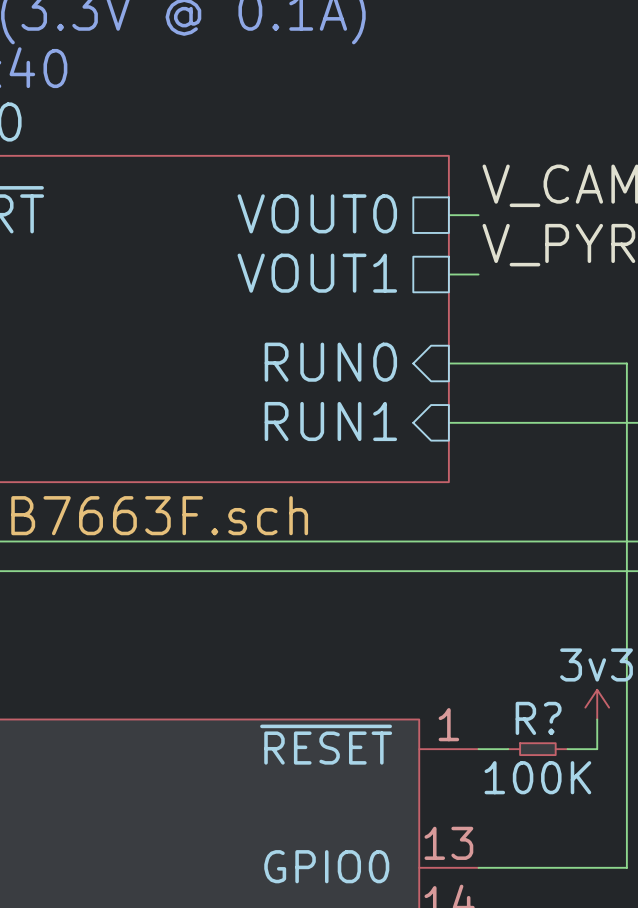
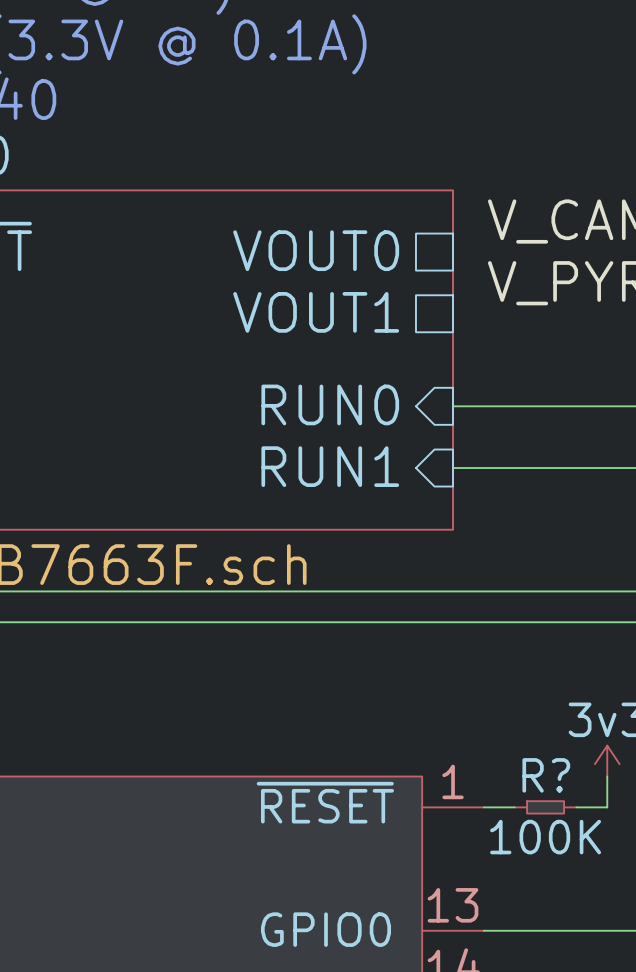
wire: (448, 215) (478, 215) -> none
wire: (448, 274) (478, 274) -> none

